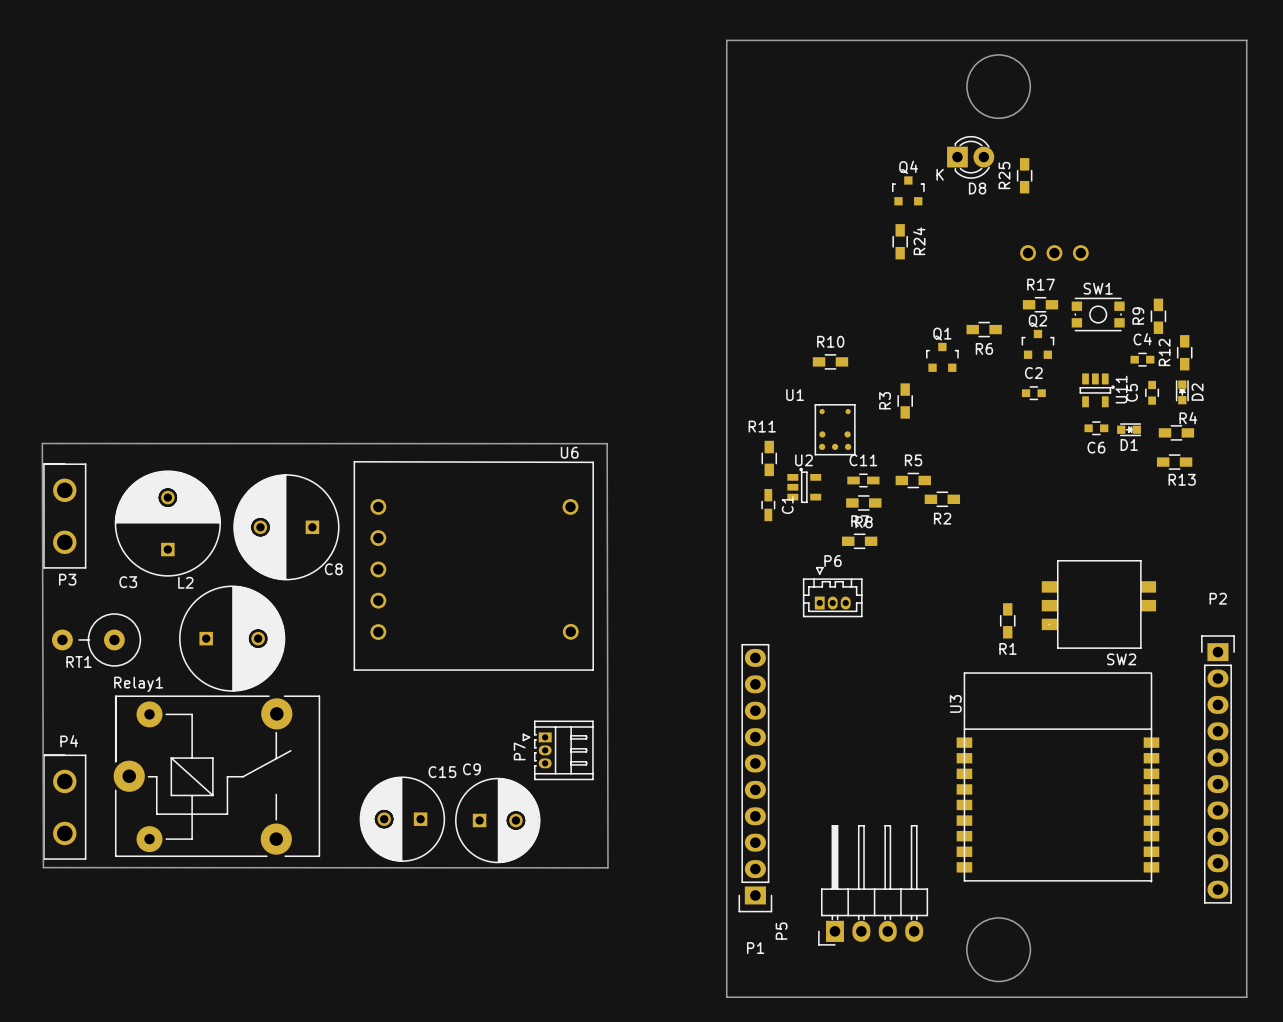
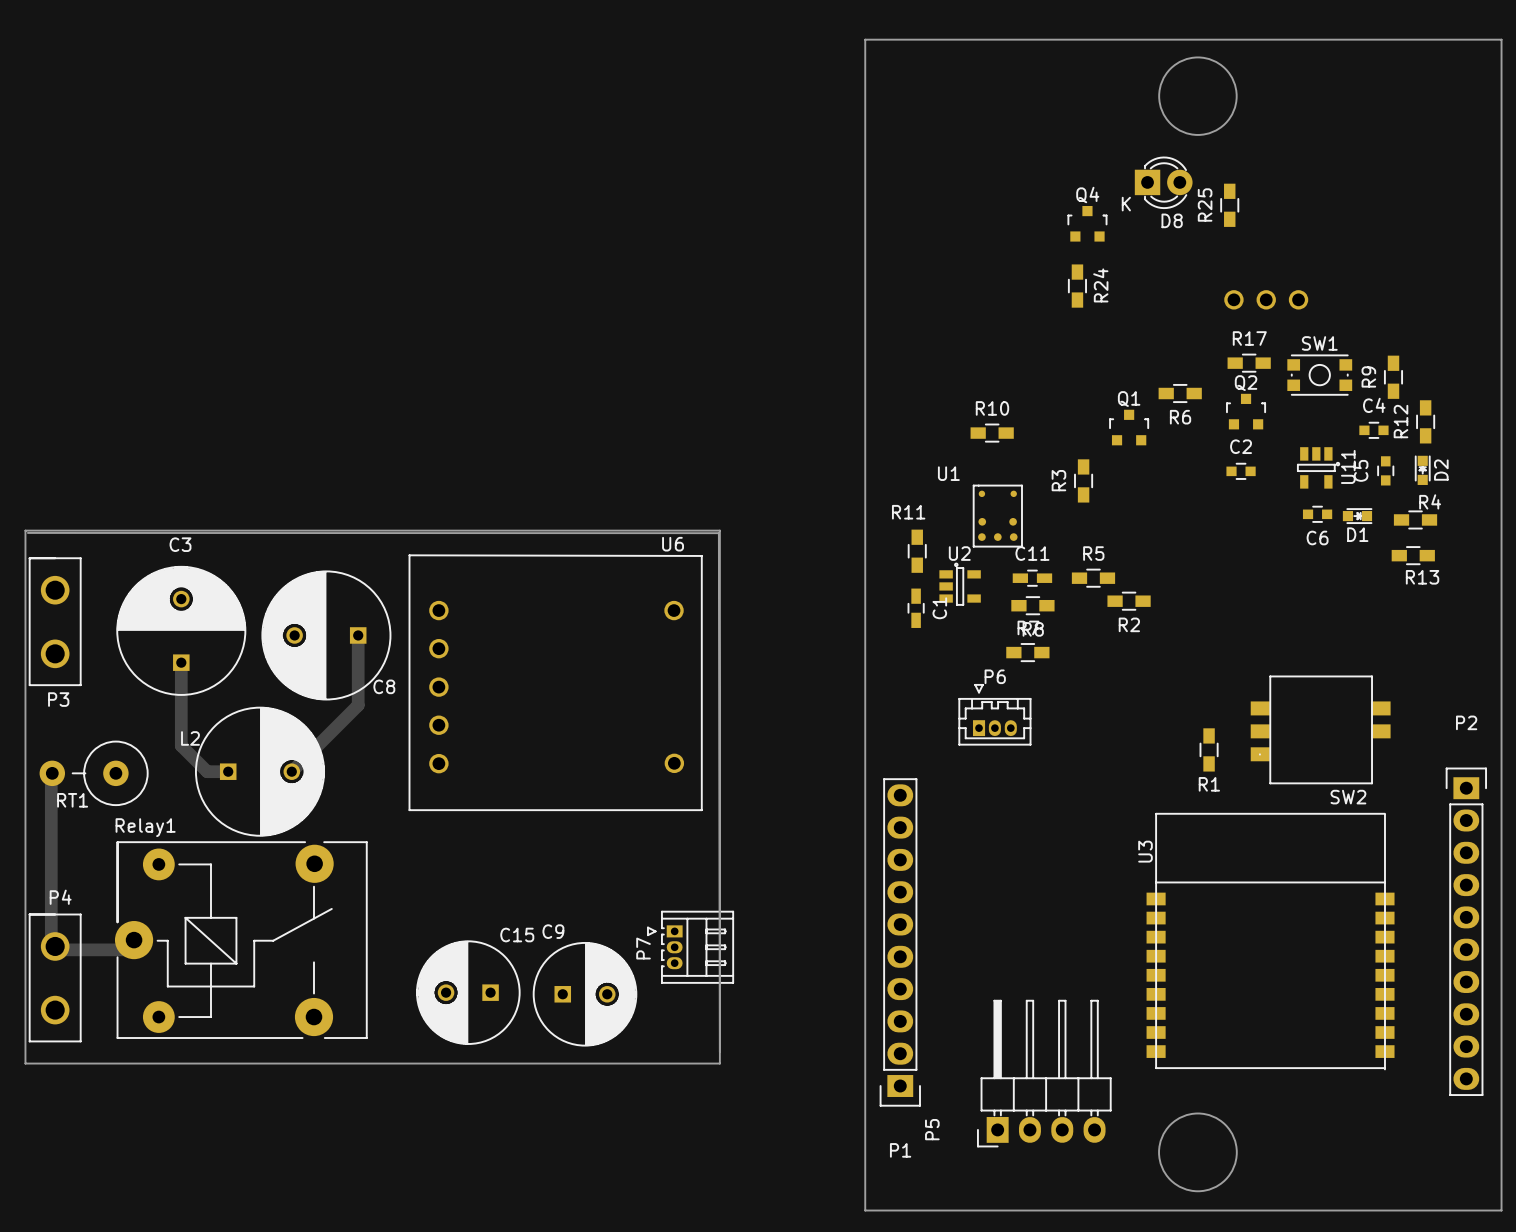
board edge: none -> (25, 530) (719, 530) (719, 1063) (25, 1063) (25, 530)
board edge: (42, 443) (43, 867) (607, 867) -> none
track: none -> (358, 635) (358, 705) (291, 771)
track: none -> (181, 662) (181, 745) (207, 771) (228, 771)
C3 name position: C3 (128, 582) -> C3 (180, 544)
L2 name position: L2 (185, 582) -> L2 (190, 738)
track: none -> (52, 780) (51, 949) (124, 949) (134, 940)
P7 position: (558, 750) -> (690, 947)

